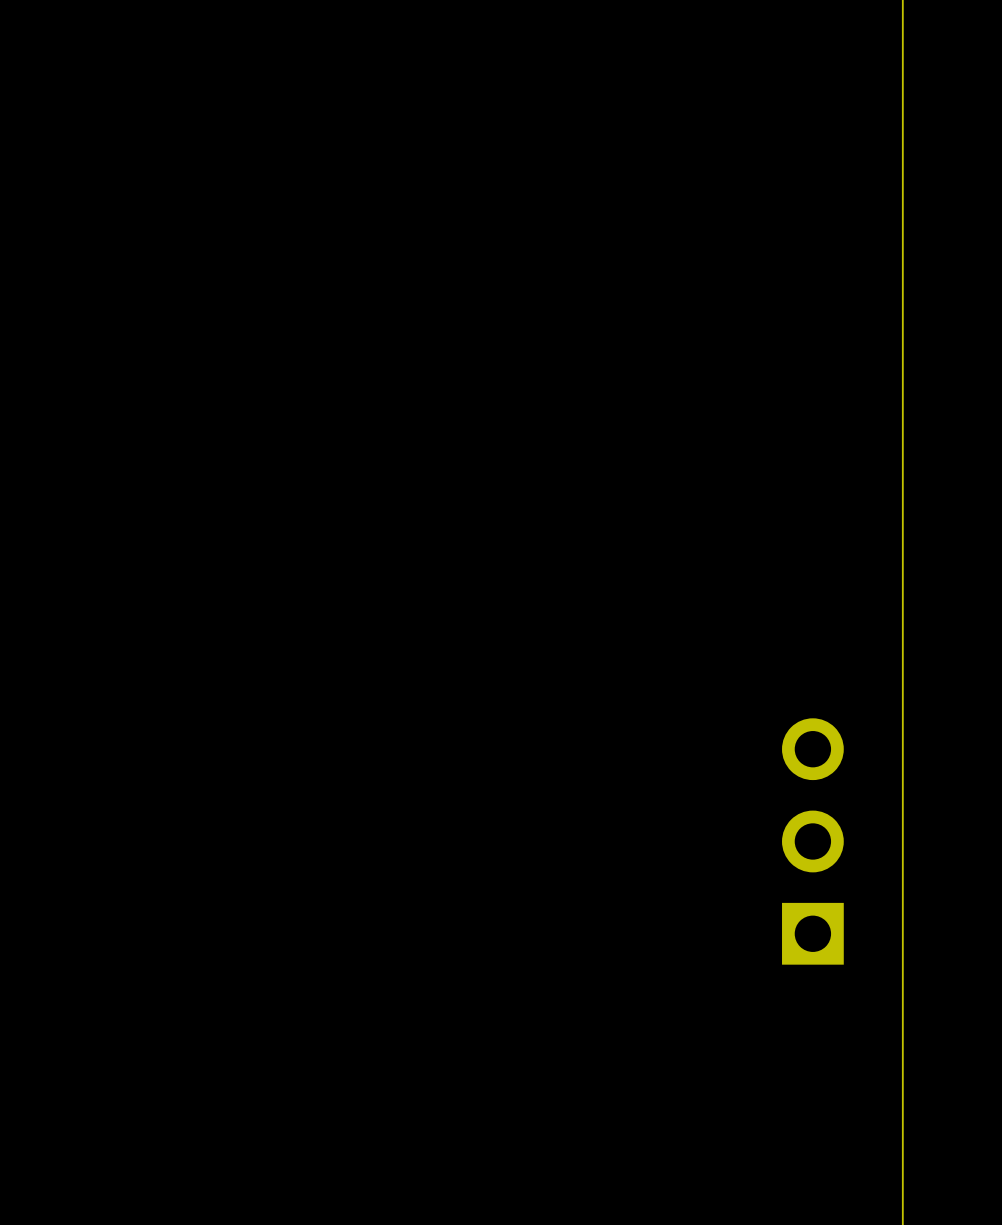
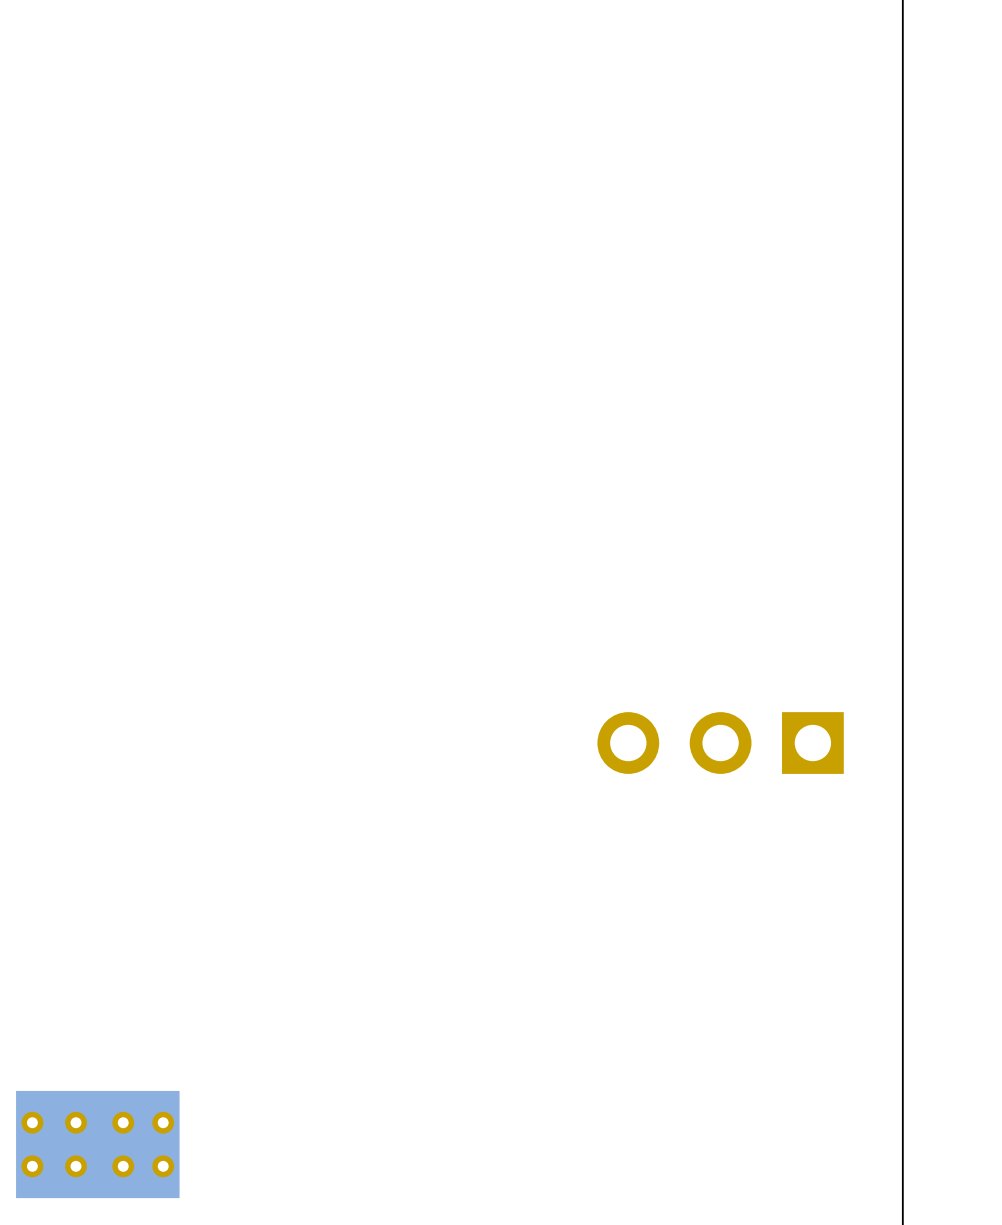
part rotation: 0° (812, 841) -> 90° counterclockwise (720, 743)
part: none -> (97, 1144)

